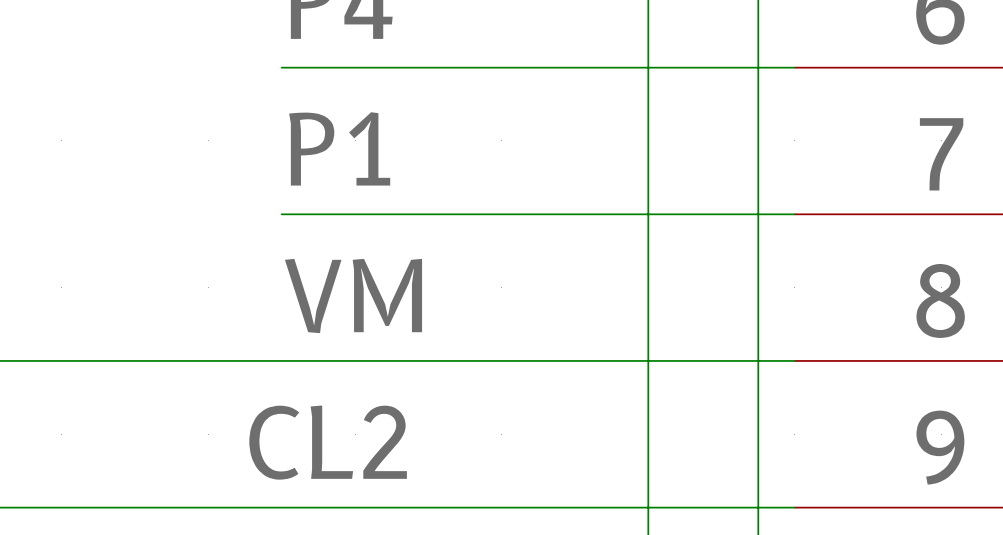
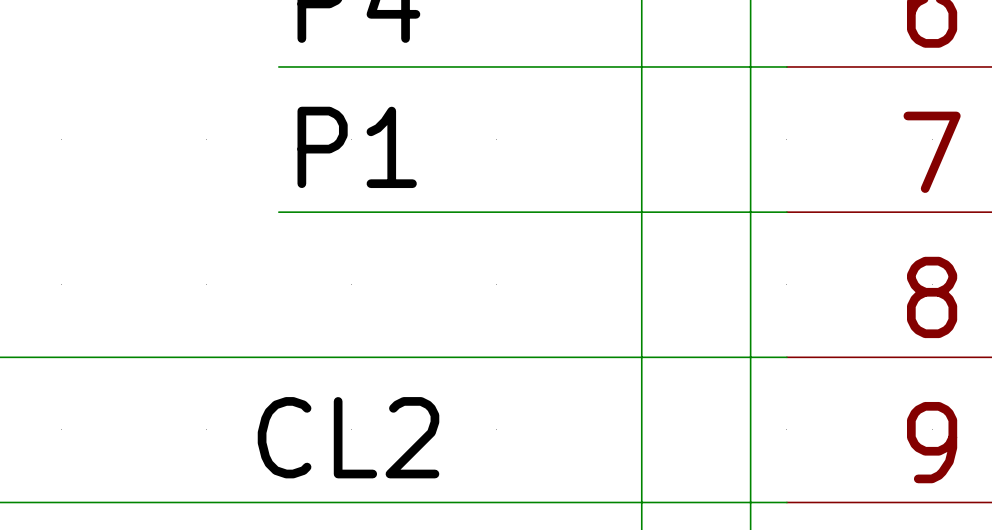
label: VM (353, 296) -> none

